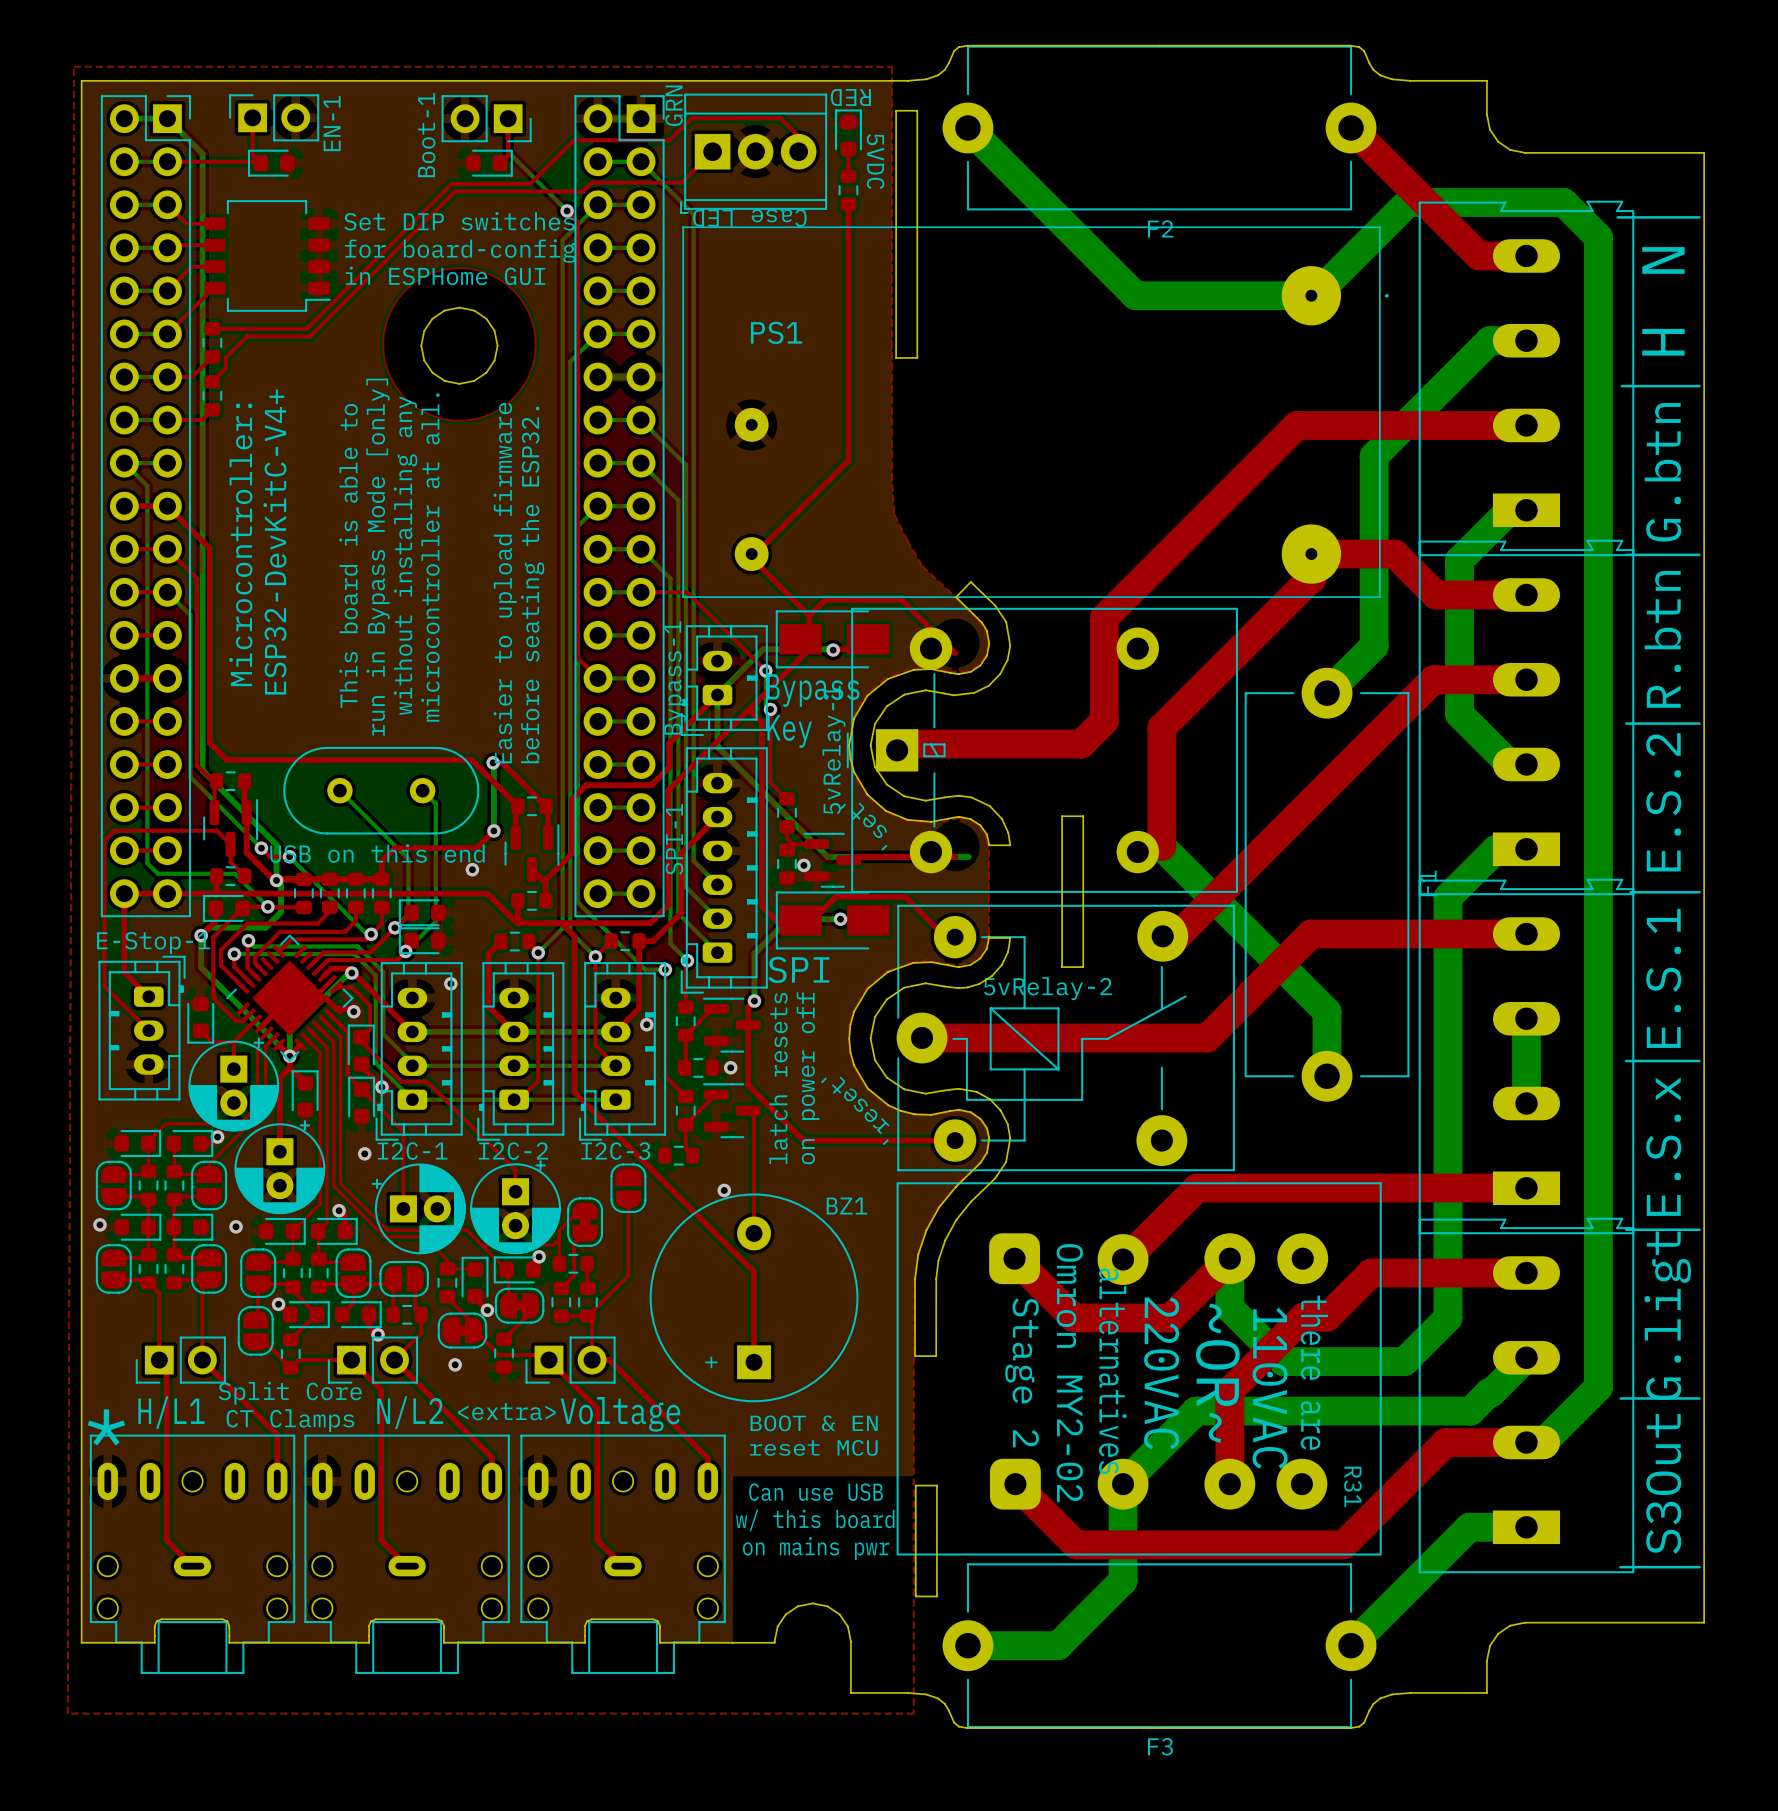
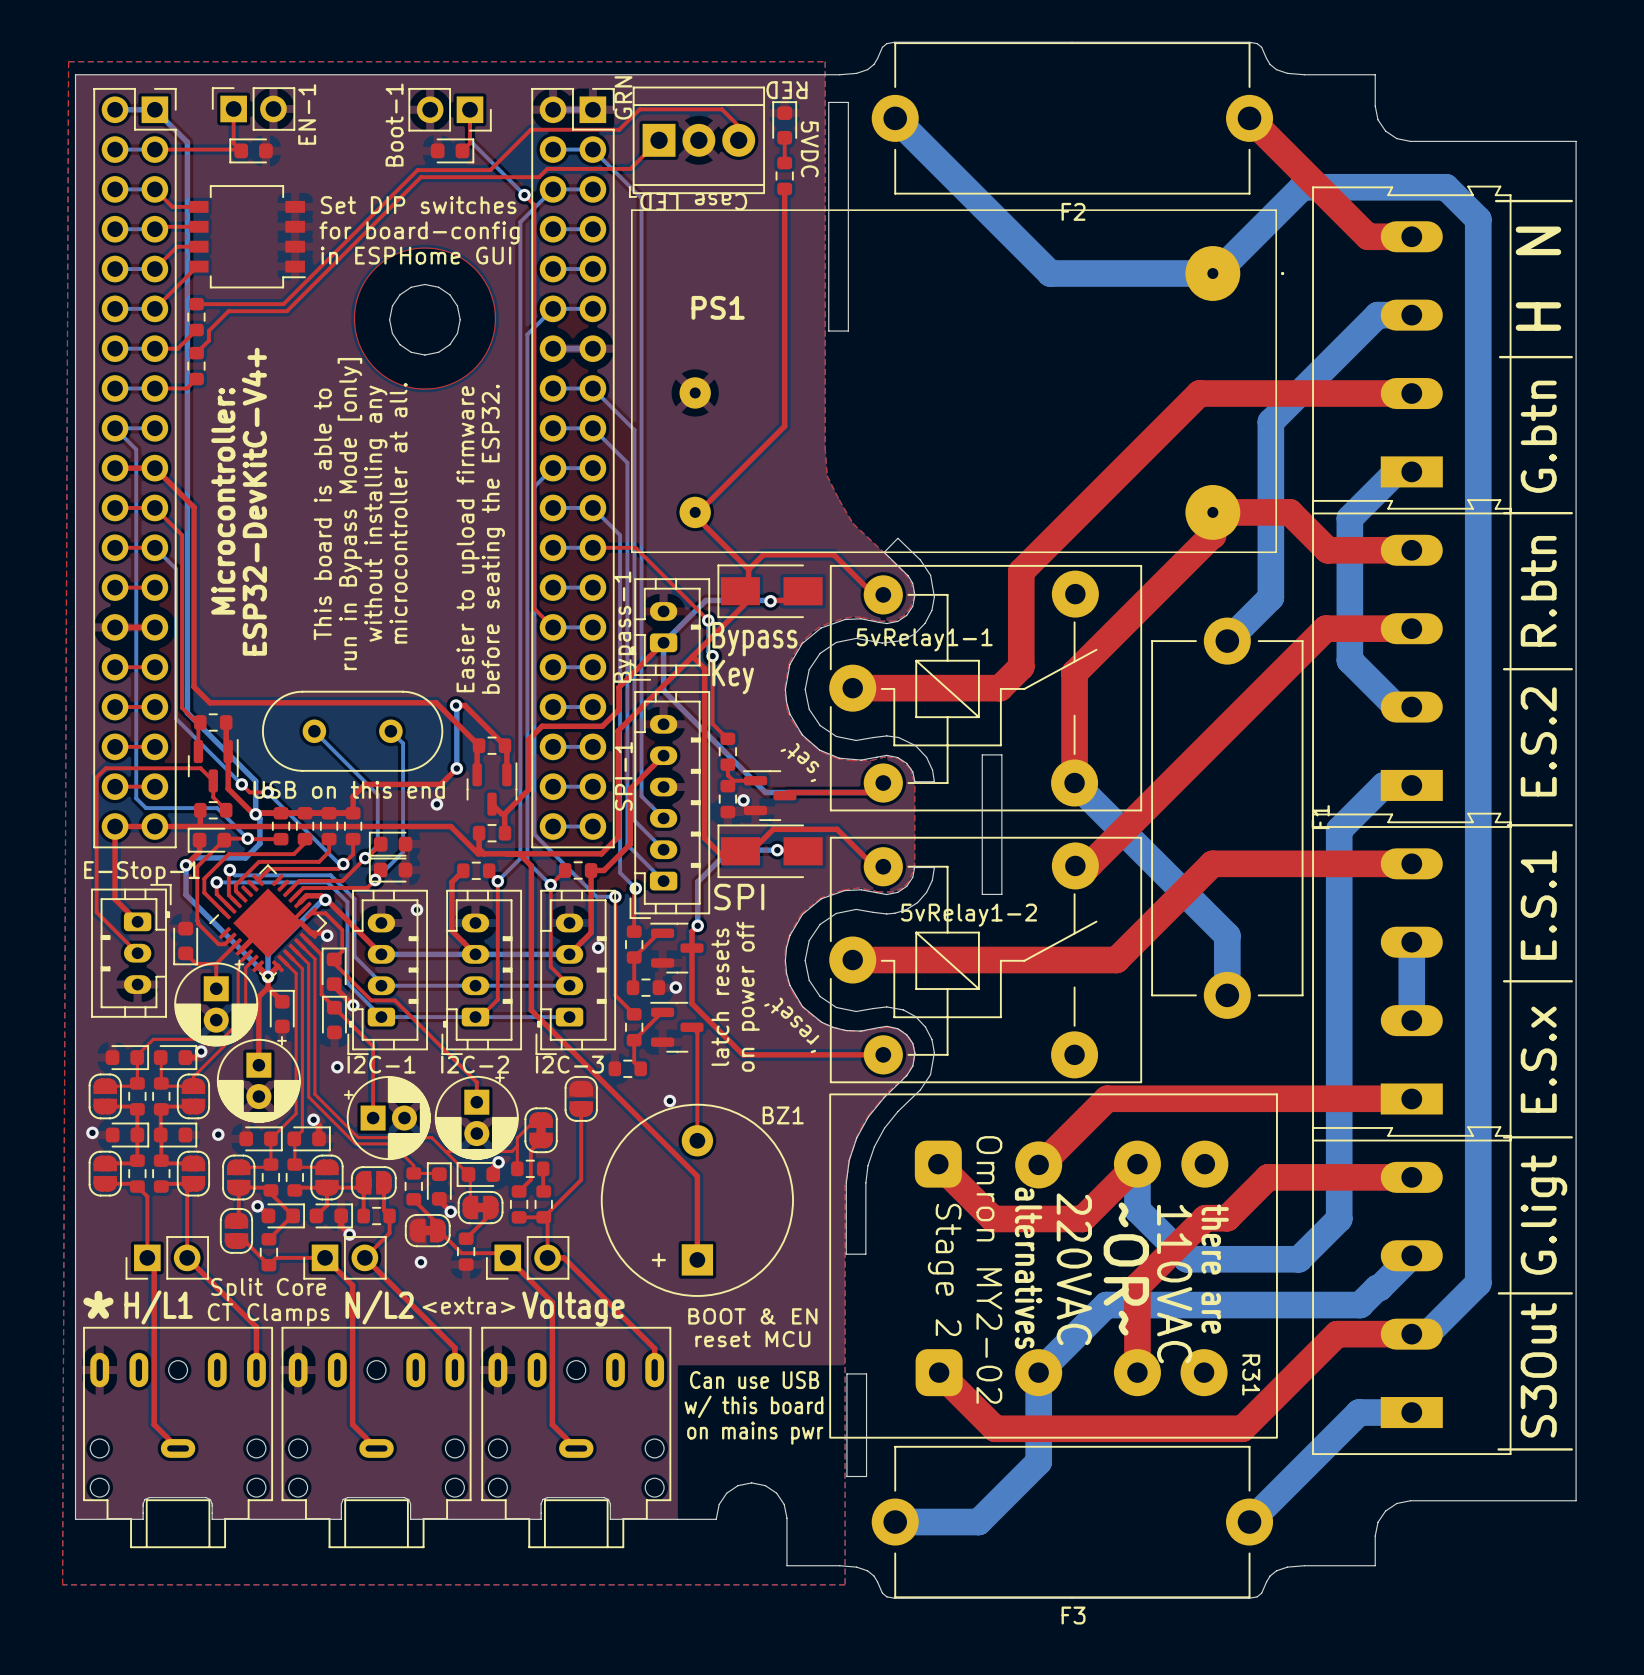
5vRelay1-1: none -> (985, 688)
5vRelay-1: (1042, 750) -> none
5vRelay-2 name: 5vRelay-2 (1047, 988) -> 5vRelay1-2 (969, 915)

